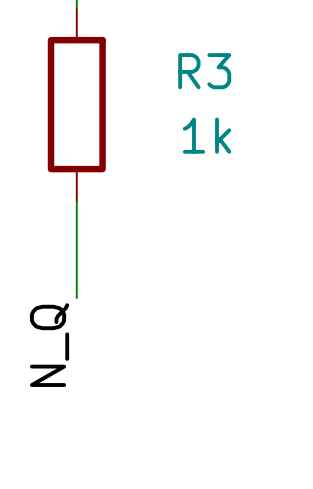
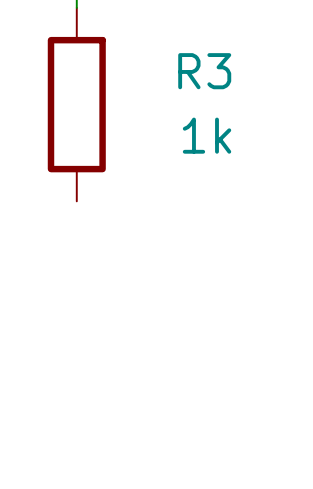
wire: (76, 201) (76, 298) -> none
label: N_Q (49, 345) -> none

